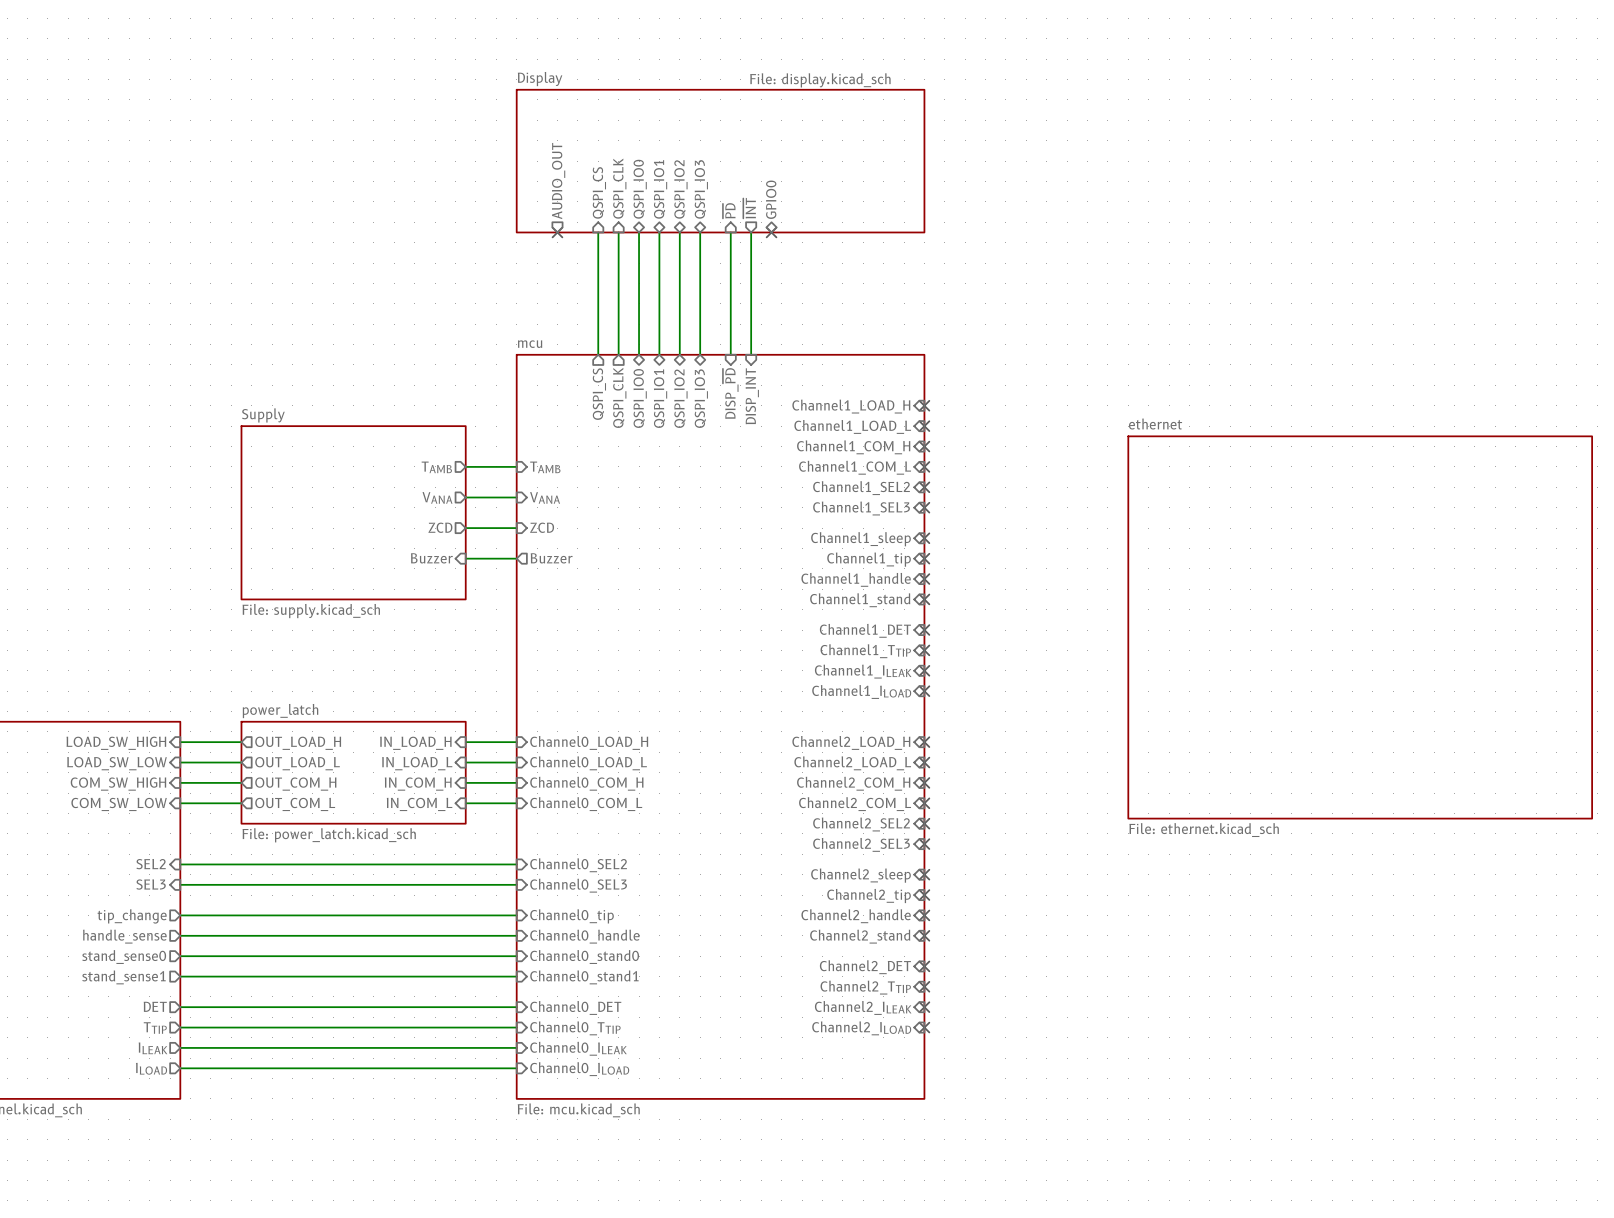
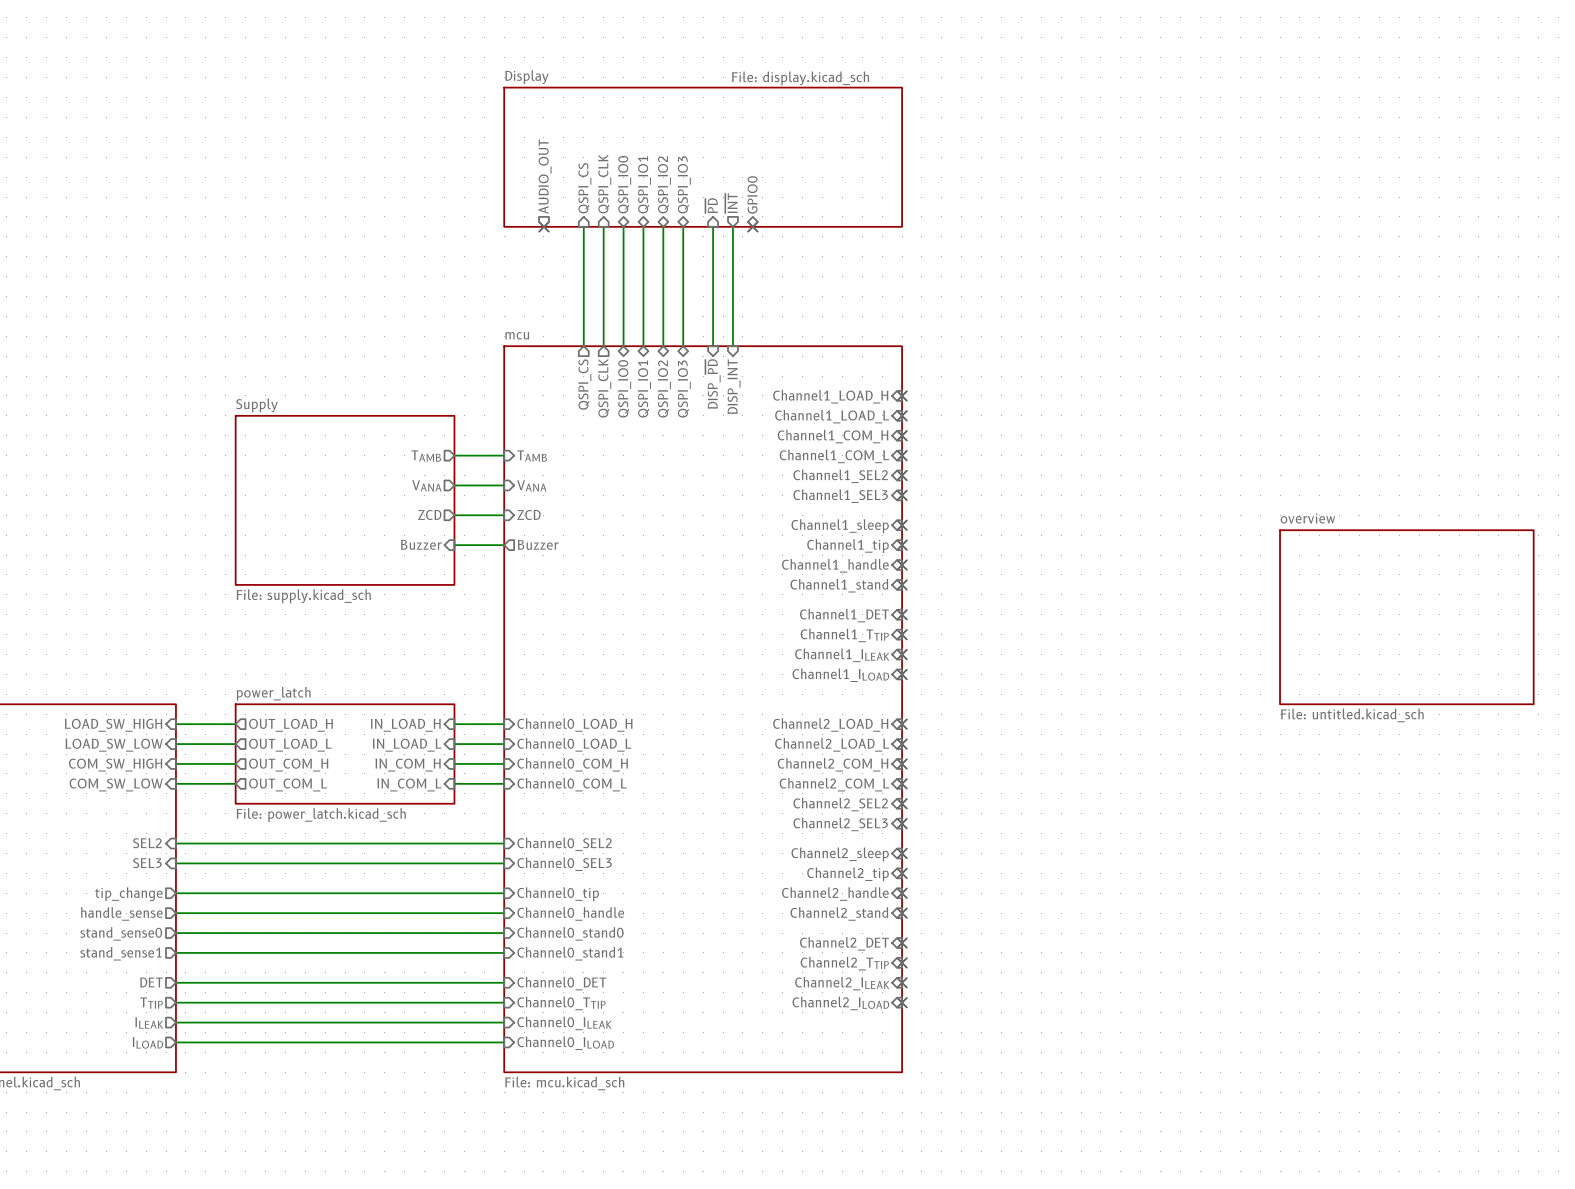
sheet ethernet: File: ethernet.kicad_sch (1360, 627) -> none
sheet overview: none -> File: untitled.kicad_sch (1406, 617)

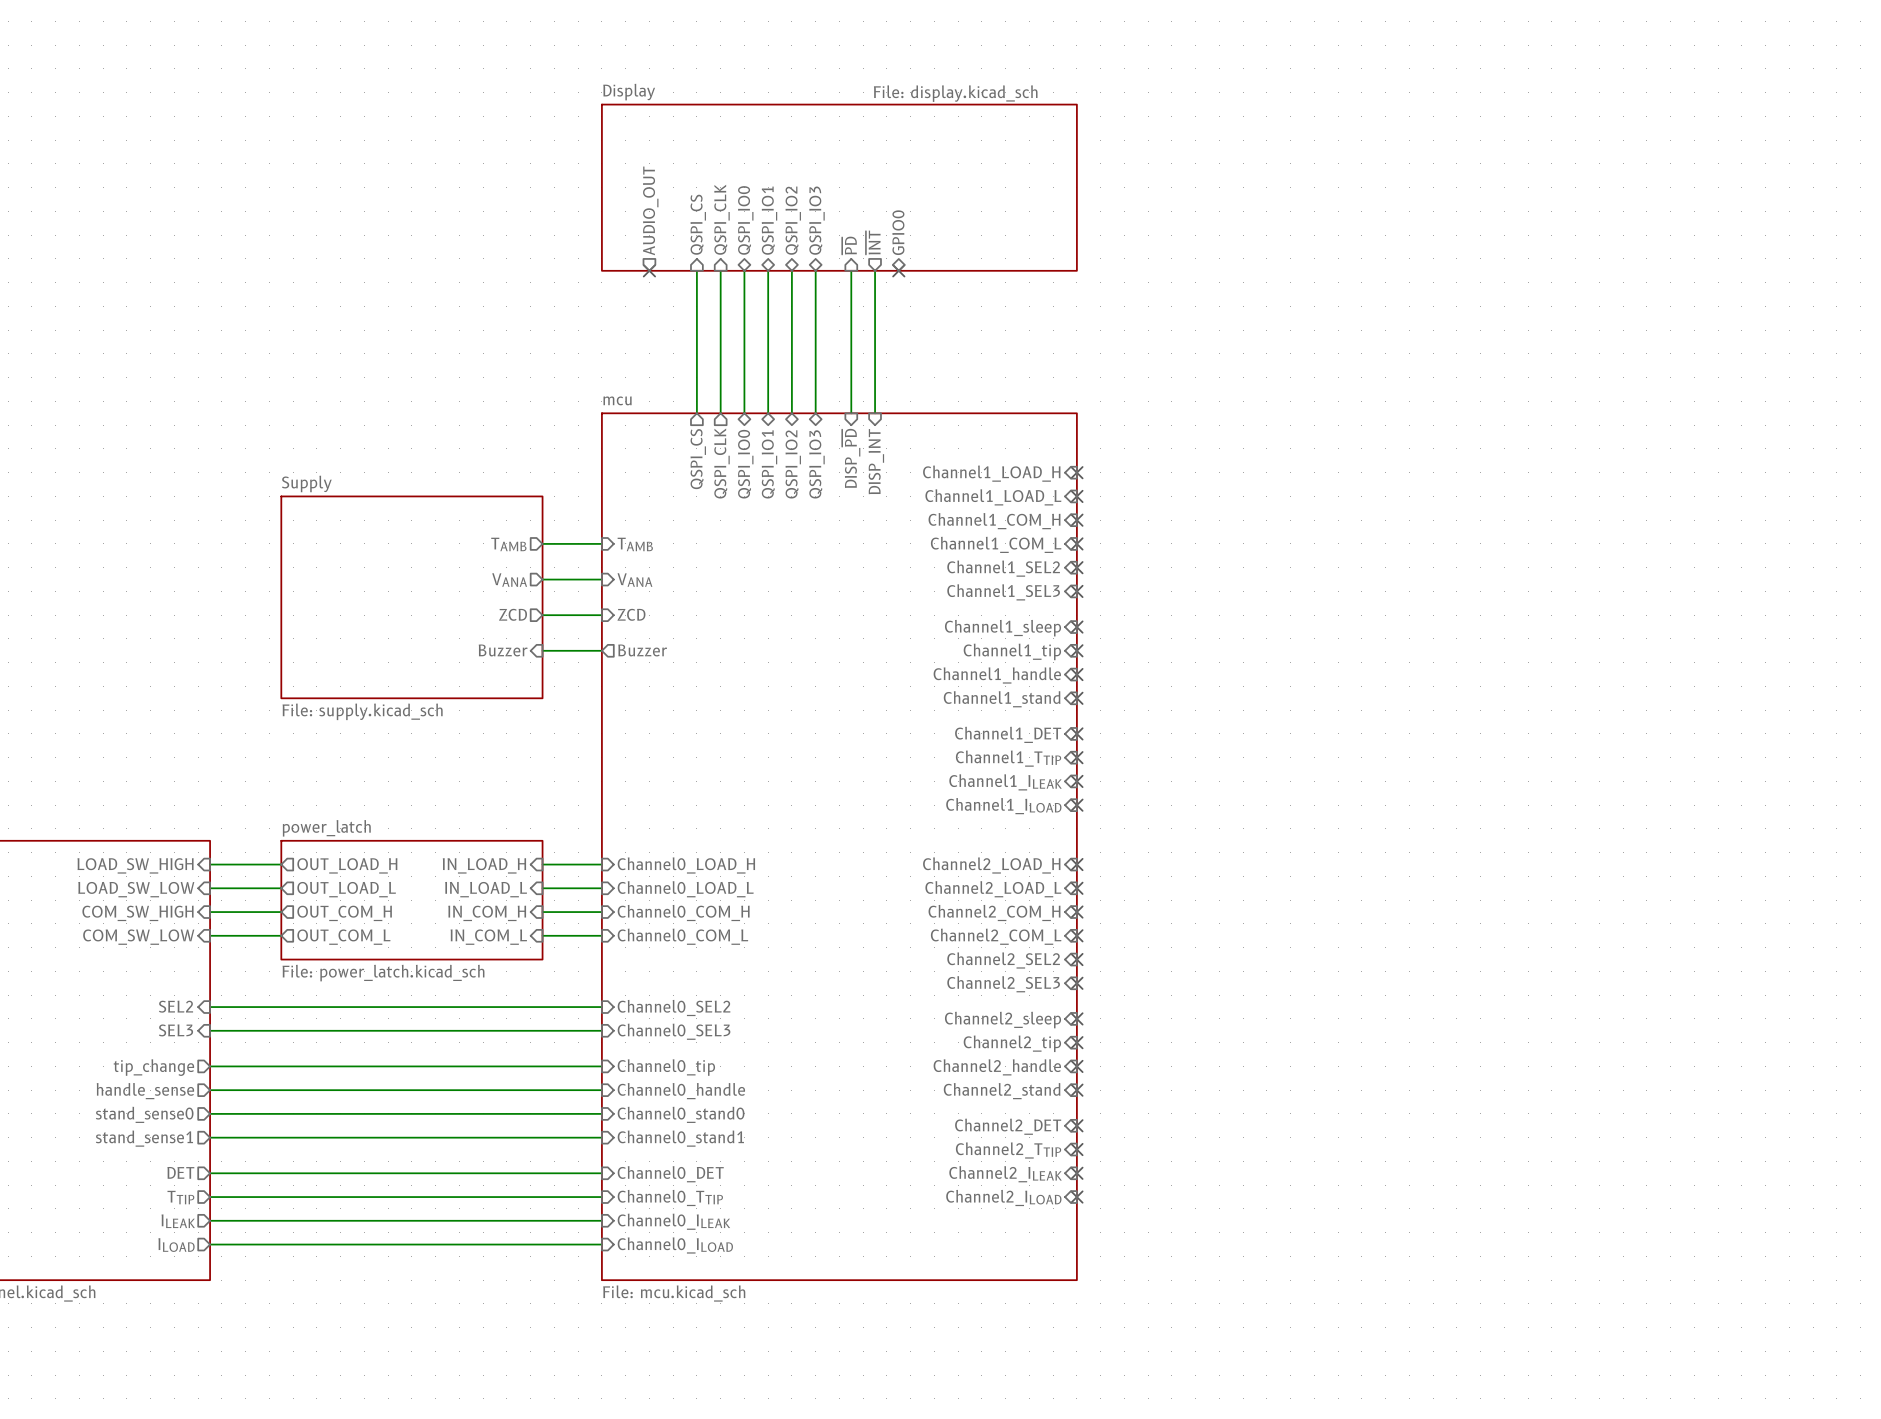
sheet overview: File: untitled.kicad_sch (1406, 617) -> none

